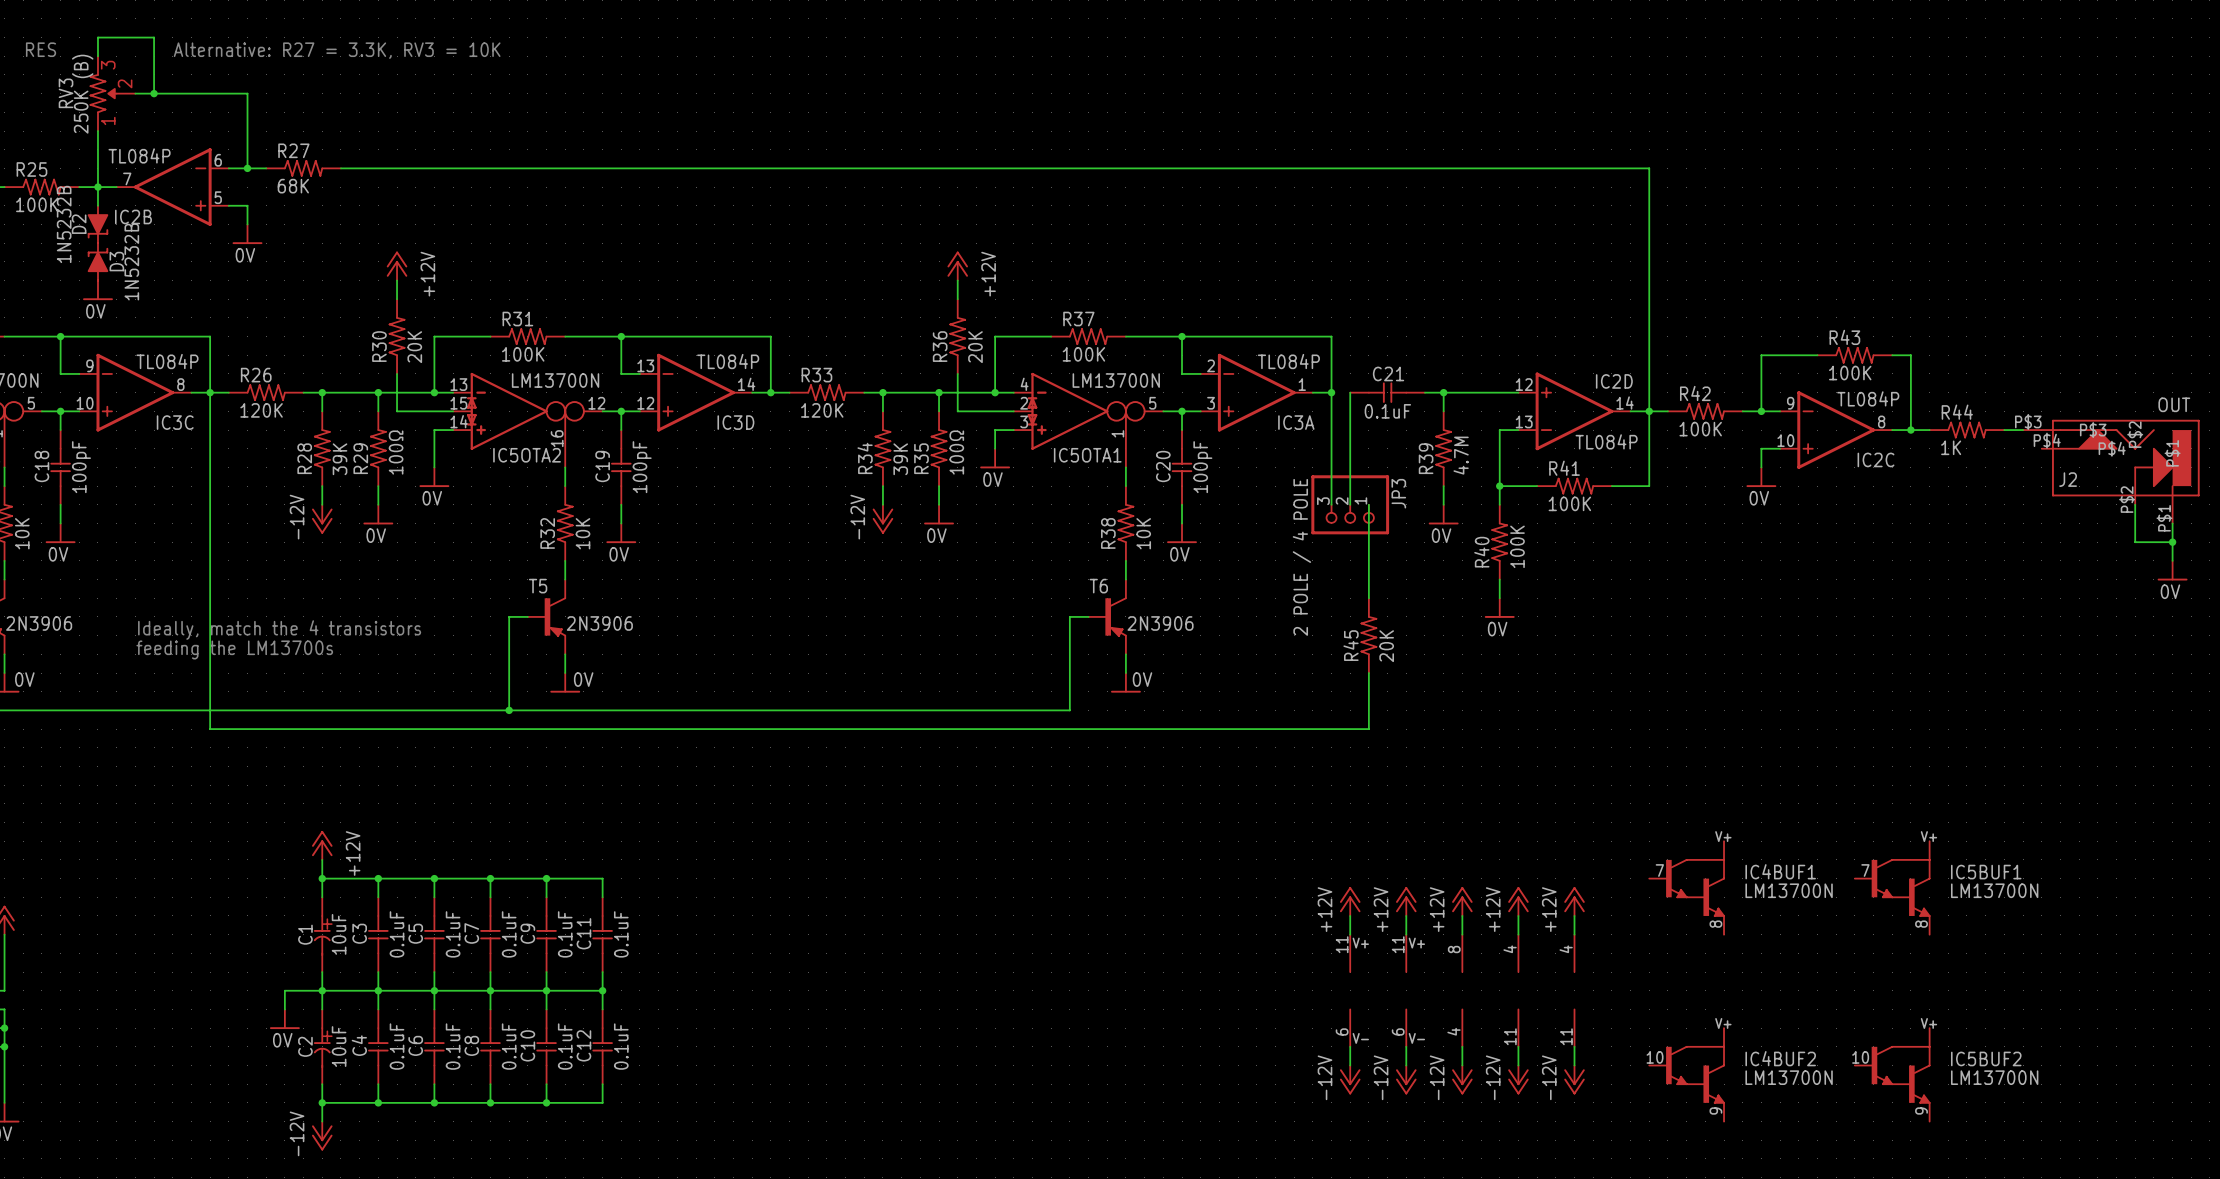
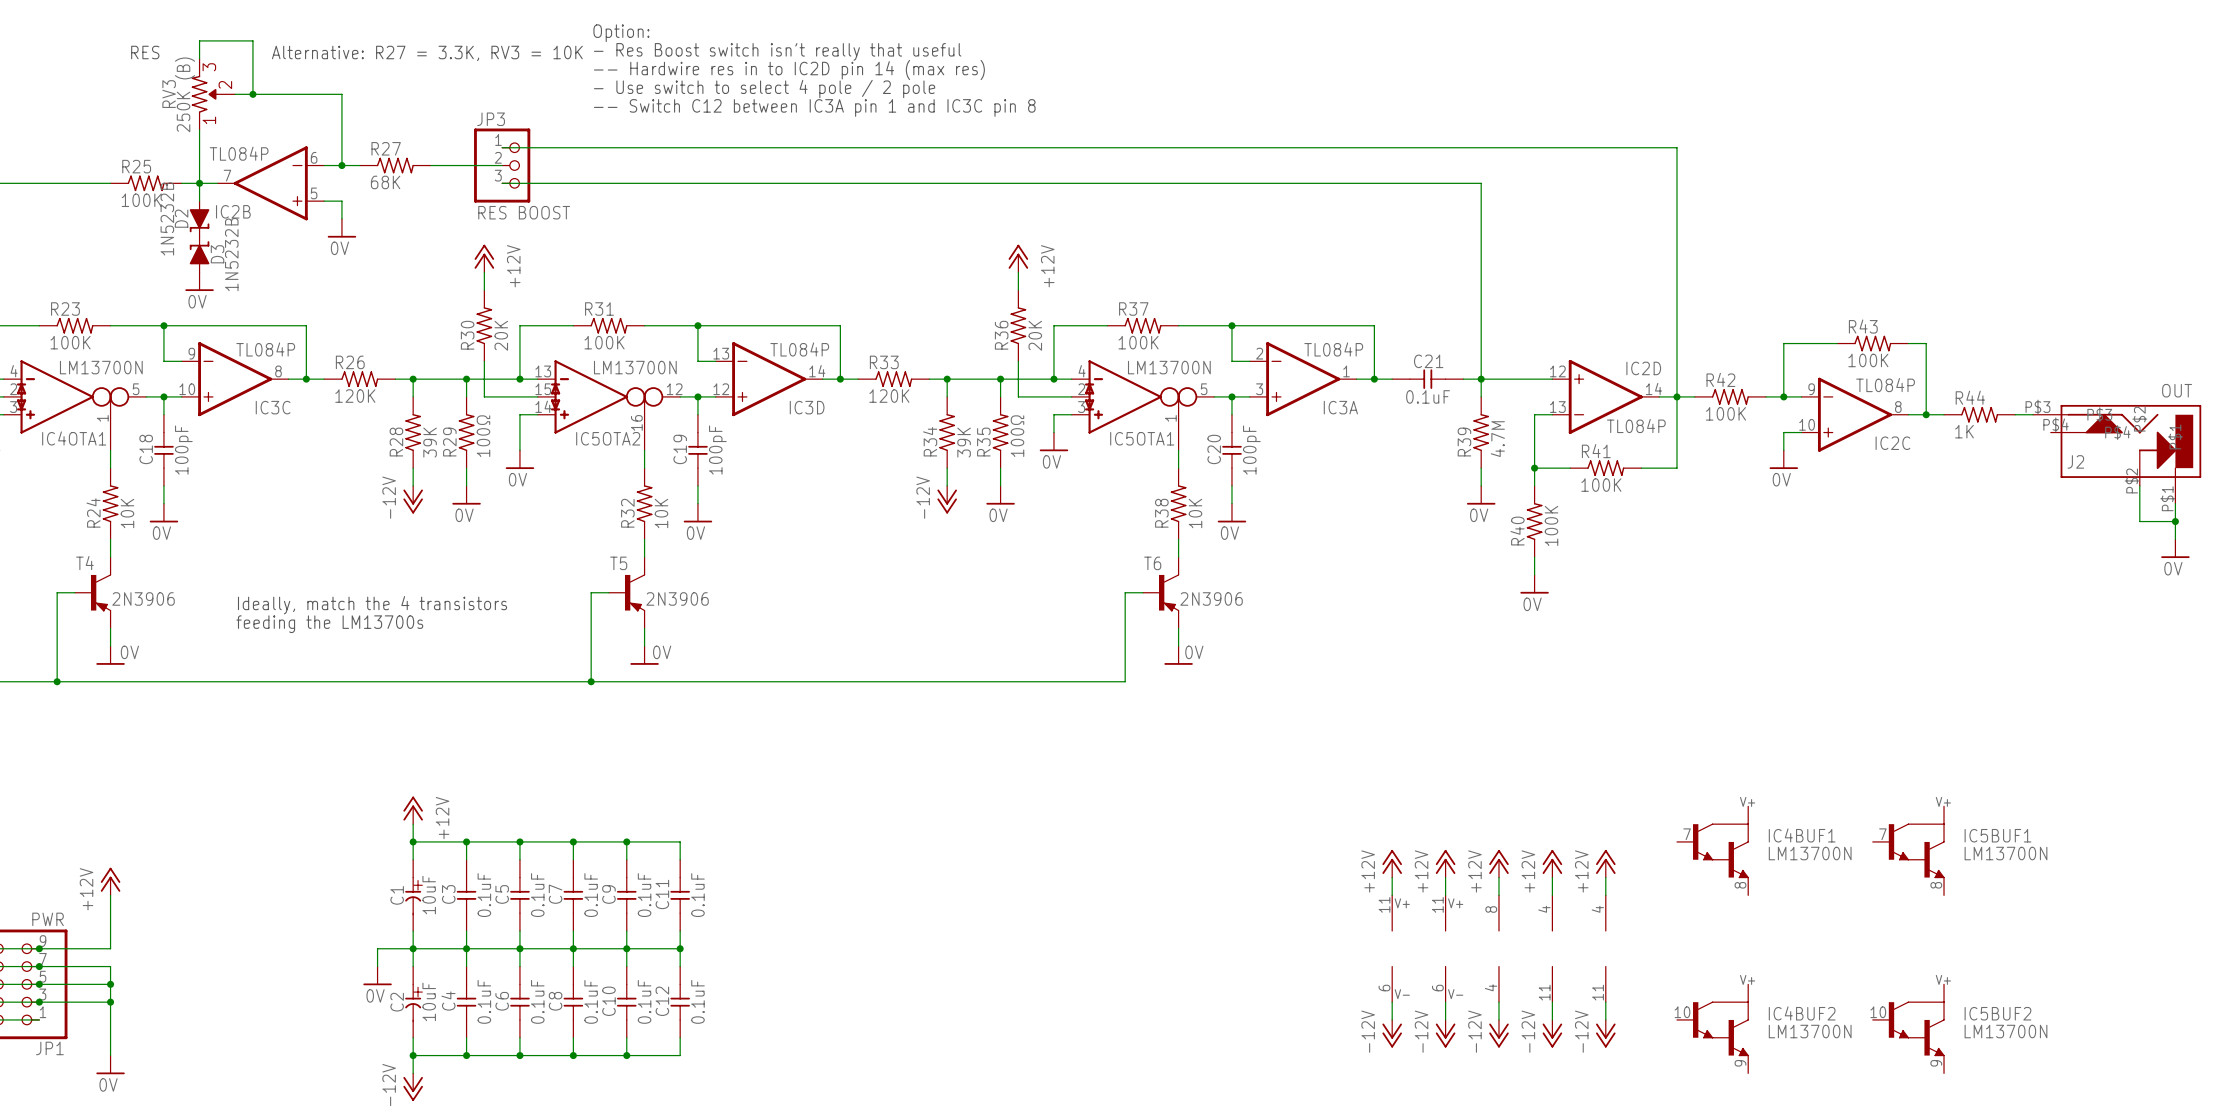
text: none -> Option: (621, 33)
text: none -> - Res Boost switch isn't really that useful (777, 51)
text: none -> -- Hardwire res in to IC2D pin 14 (max res) (789, 70)
text: none -> - Use switch to select 4 pole / 2 pole (764, 88)
text: none -> -- Switch C12 between IC3A pin 1 and IC3C pin 8 (814, 107)
wire: (415, 168) (1649, 168) -> (502, 147) (1676, 147) (1676, 165)
wire: none -> (502, 183) (1481, 183) (1481, 379)
wire: (210, 392) (210, 729) (1368, 729) (1368, 673) -> none
wire: (1331, 392) (1331, 504) -> (1374, 379) (1392, 379)
wire: (1350, 392) (1350, 504) -> none
JP3 rotation: 0° (1350, 504) -> 90° counterclockwise (502, 165)
JP3 position: (1350, 504) -> (502, 165)
wire: (1368, 504) (1368, 598) -> none
JP3 value: 2 POLE / 4 POLE (1301, 557) -> RES BOOST (524, 212)
R45: 20K (1368, 635) -> none

